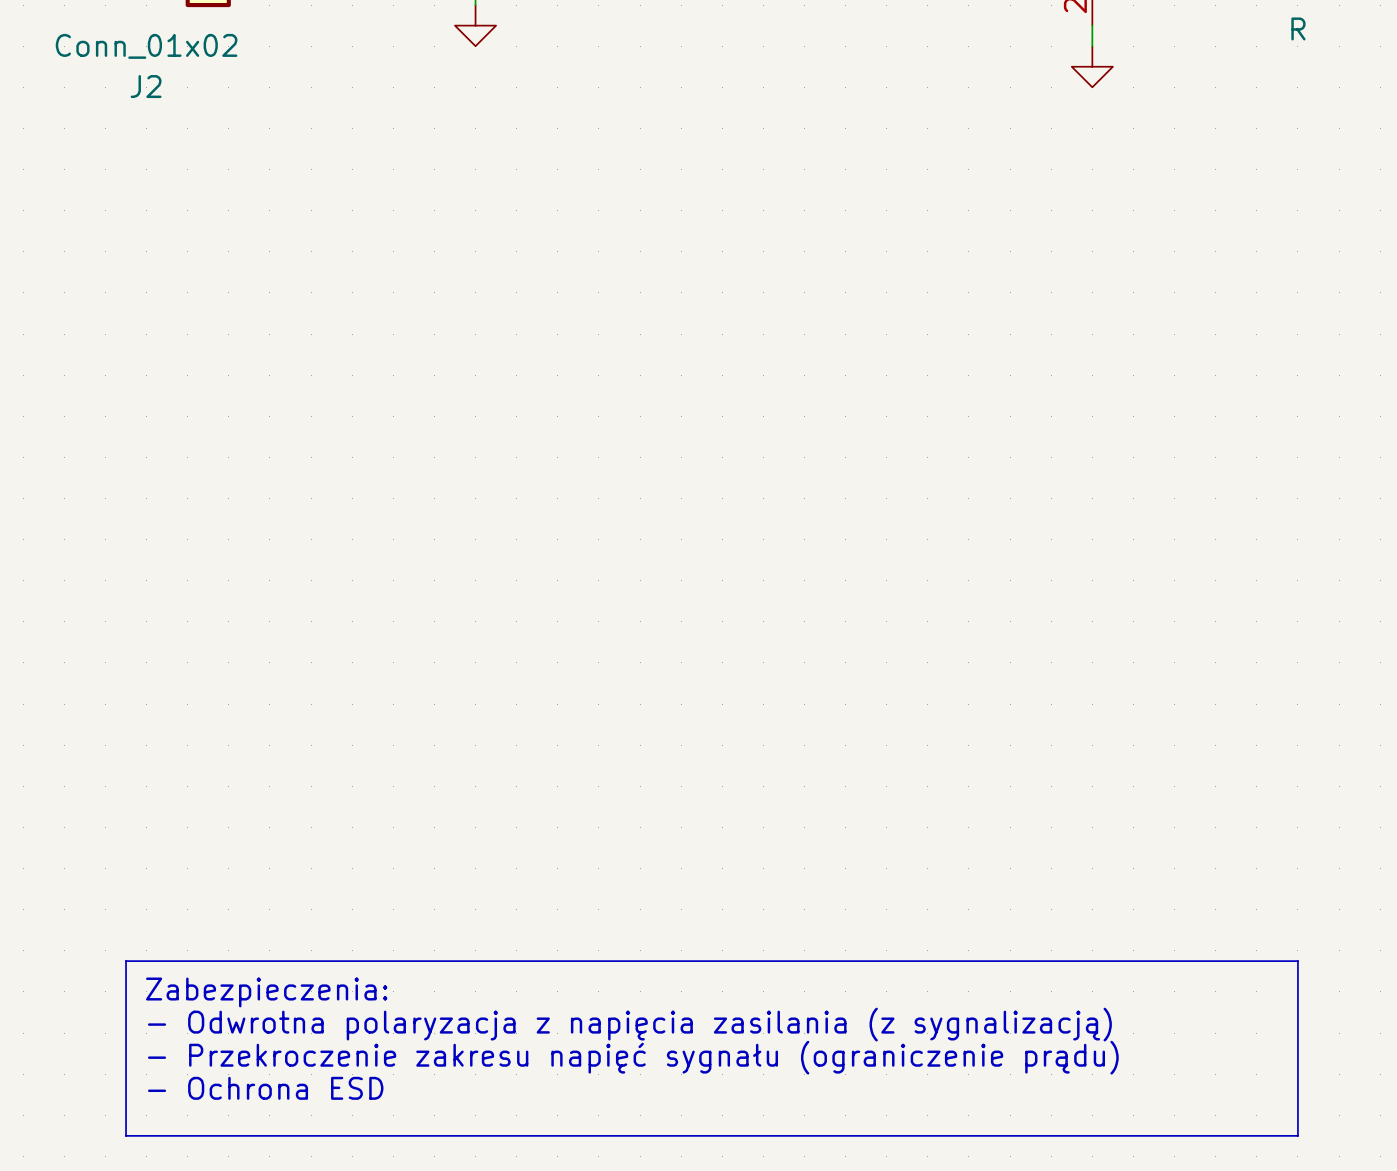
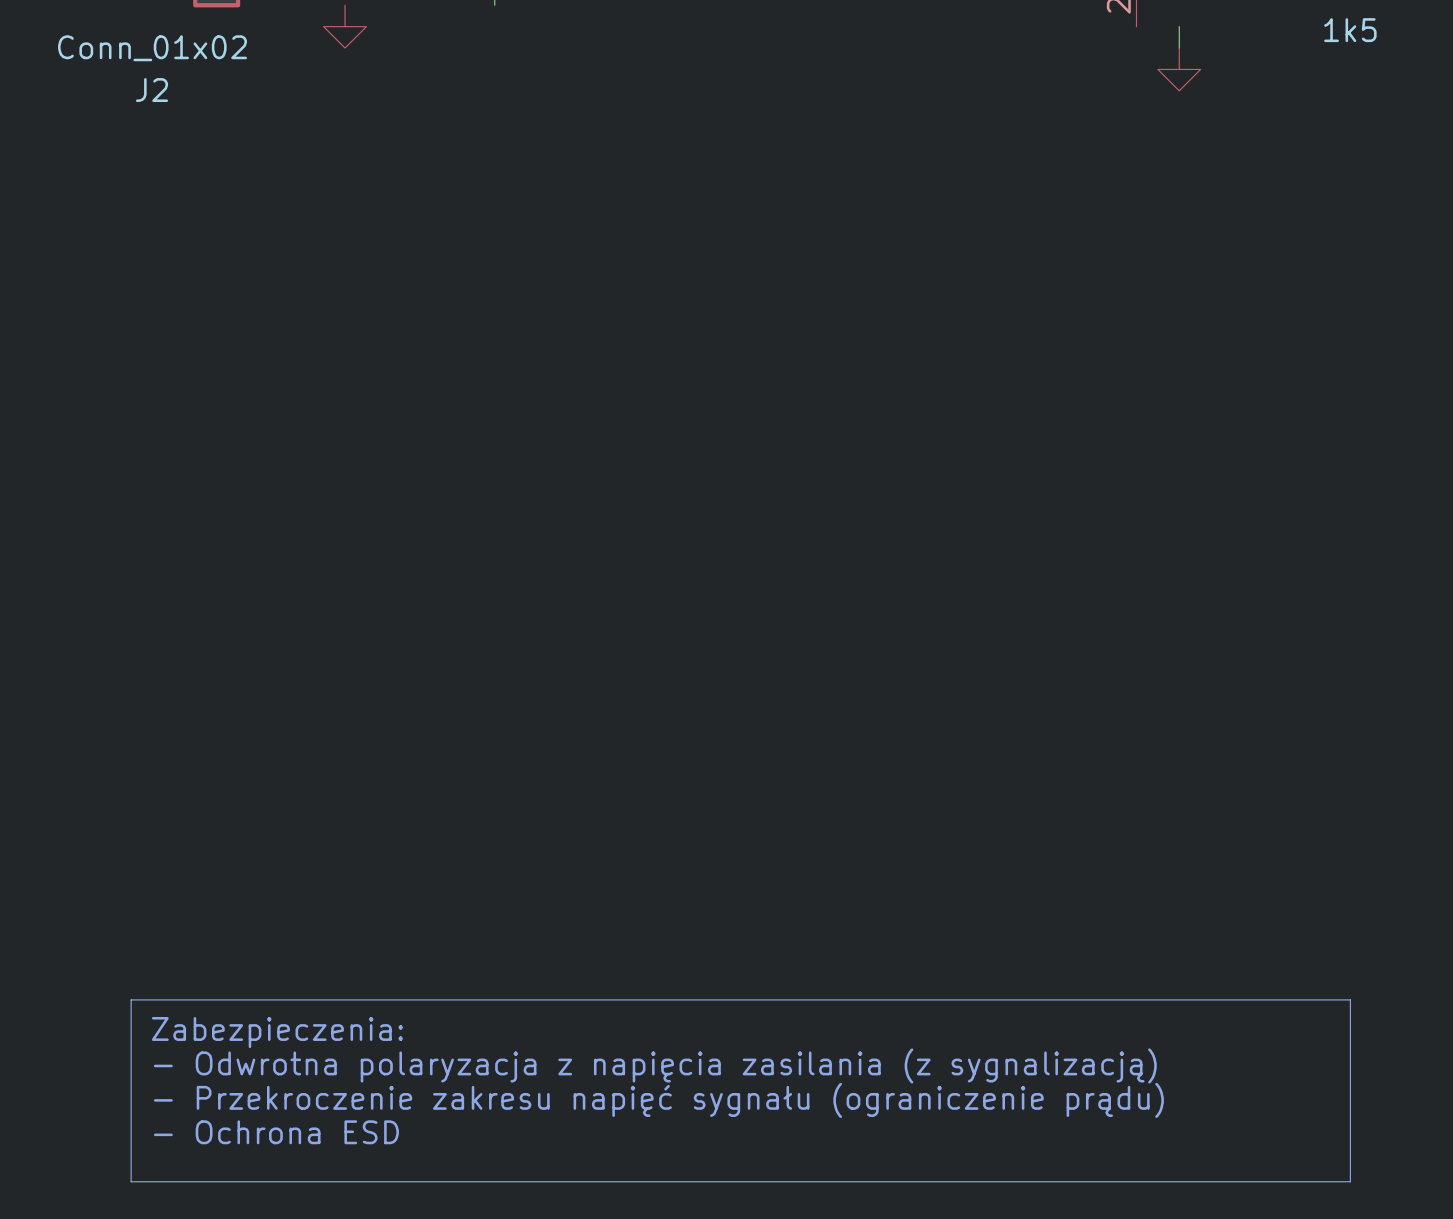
power symbol: none -> (345, 26)
power symbol: (475, 25) -> none
wire: (1092, 25) (1092, 46) -> (1179, 26) (1179, 48)
part value: R (1298, 28) -> 1k5 (1350, 30)
power symbol position: (1092, 66) -> (1179, 69)

